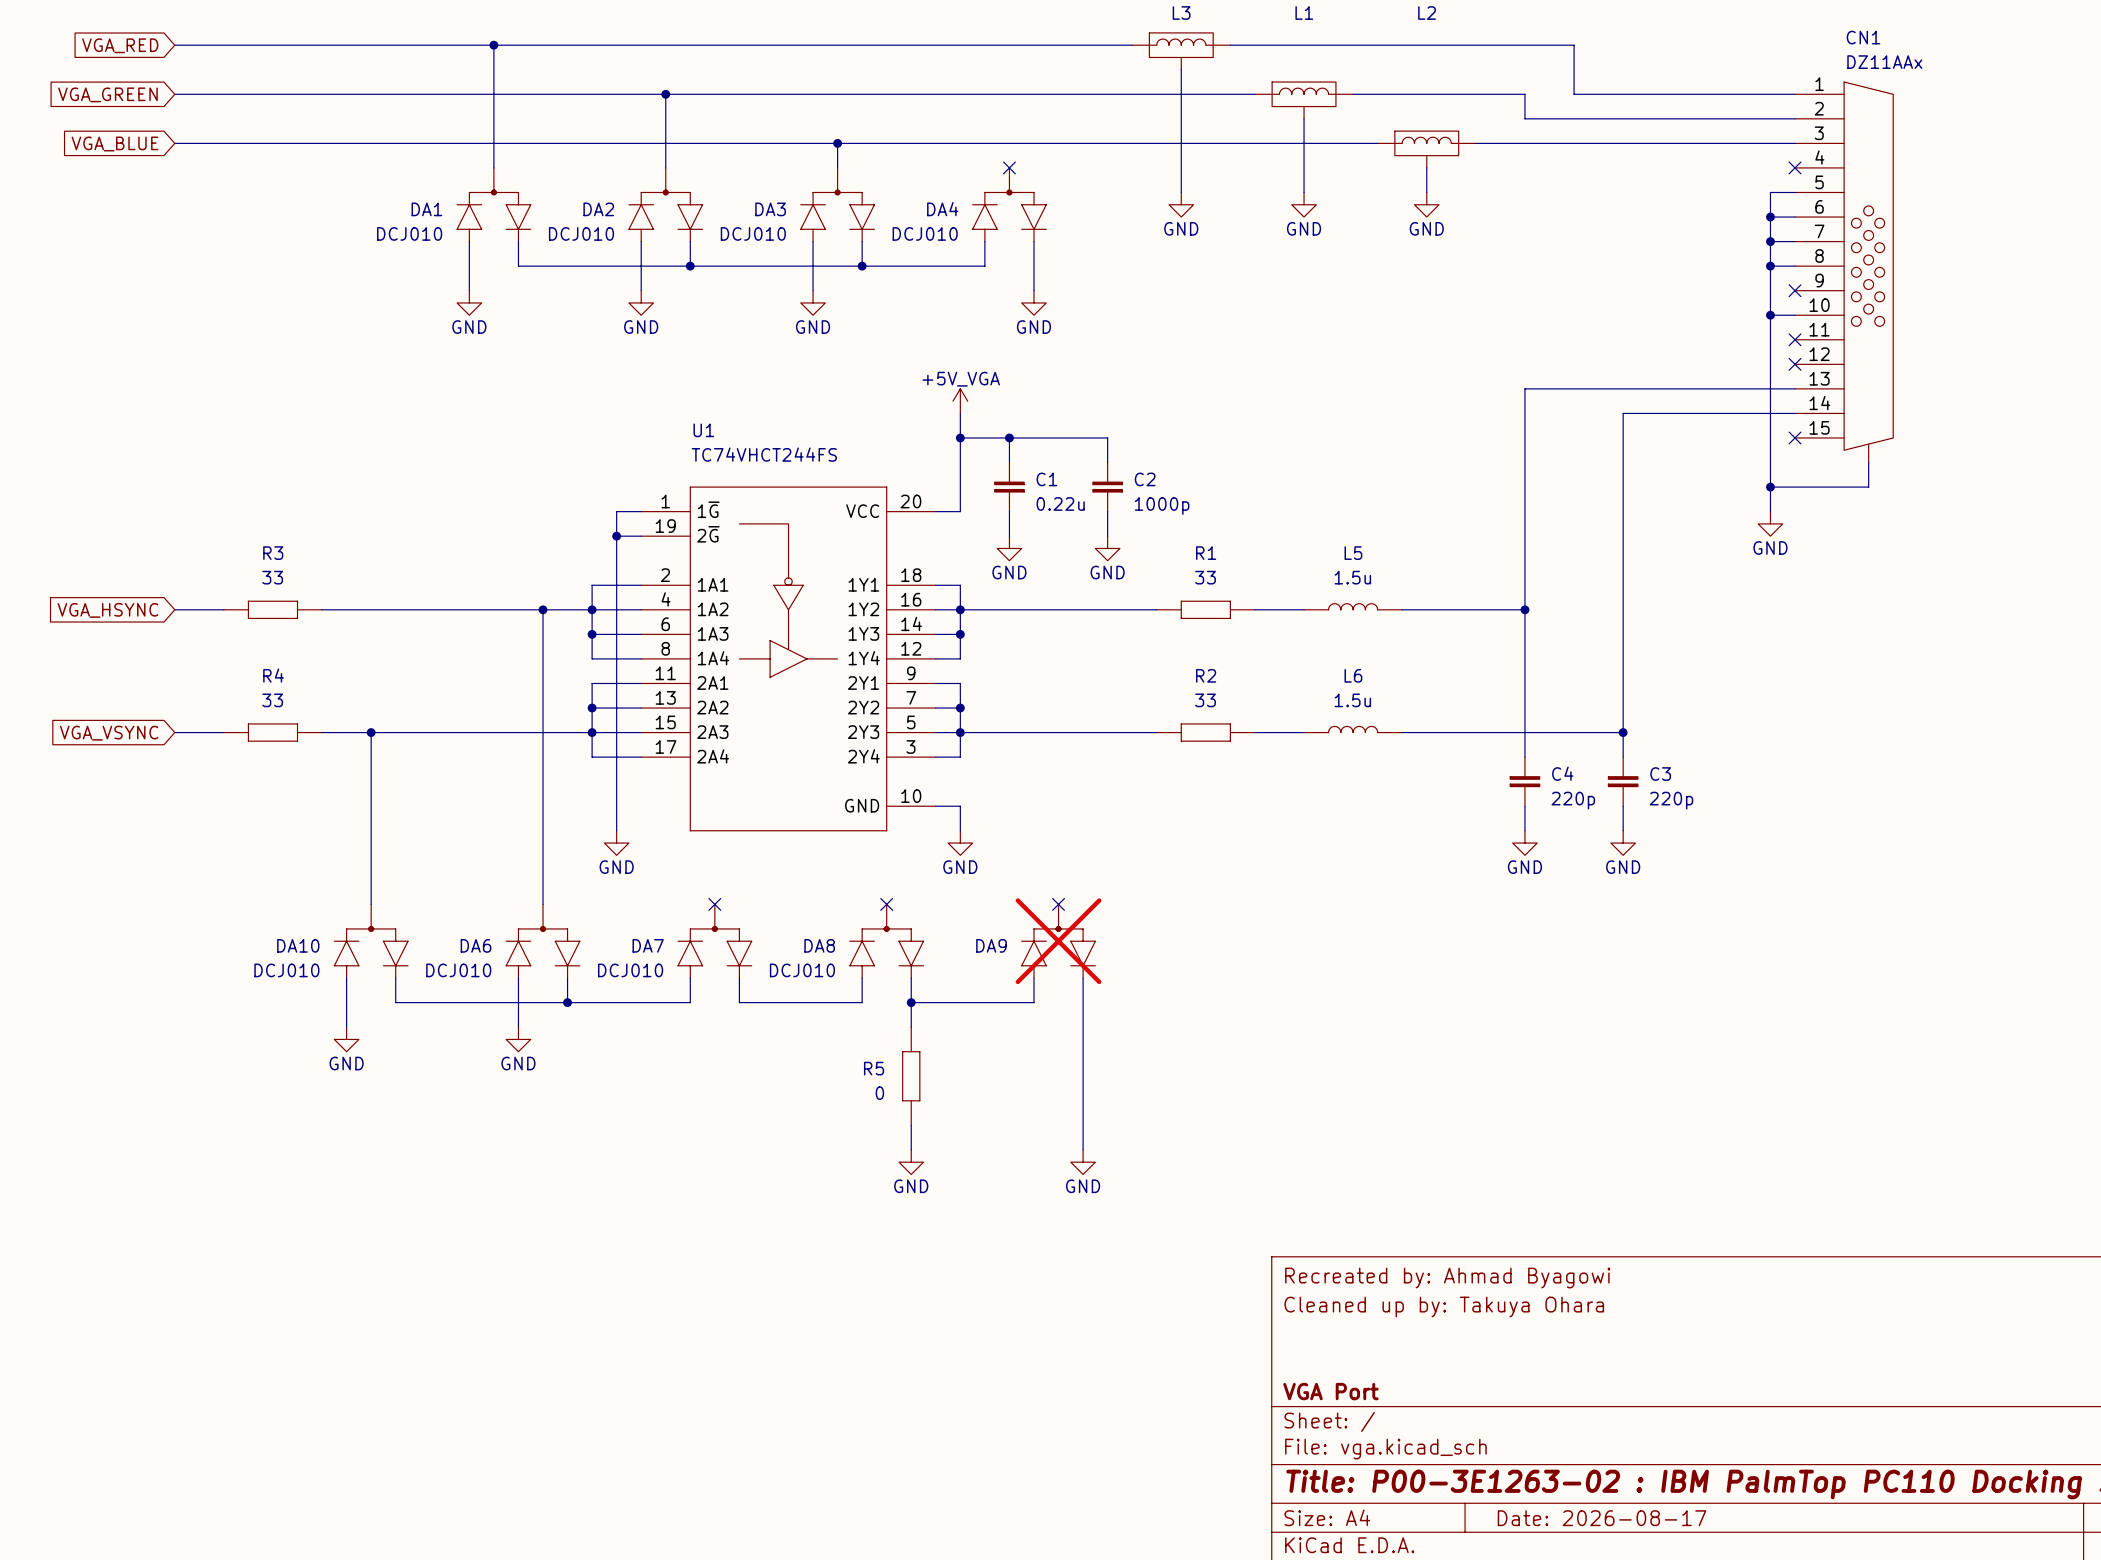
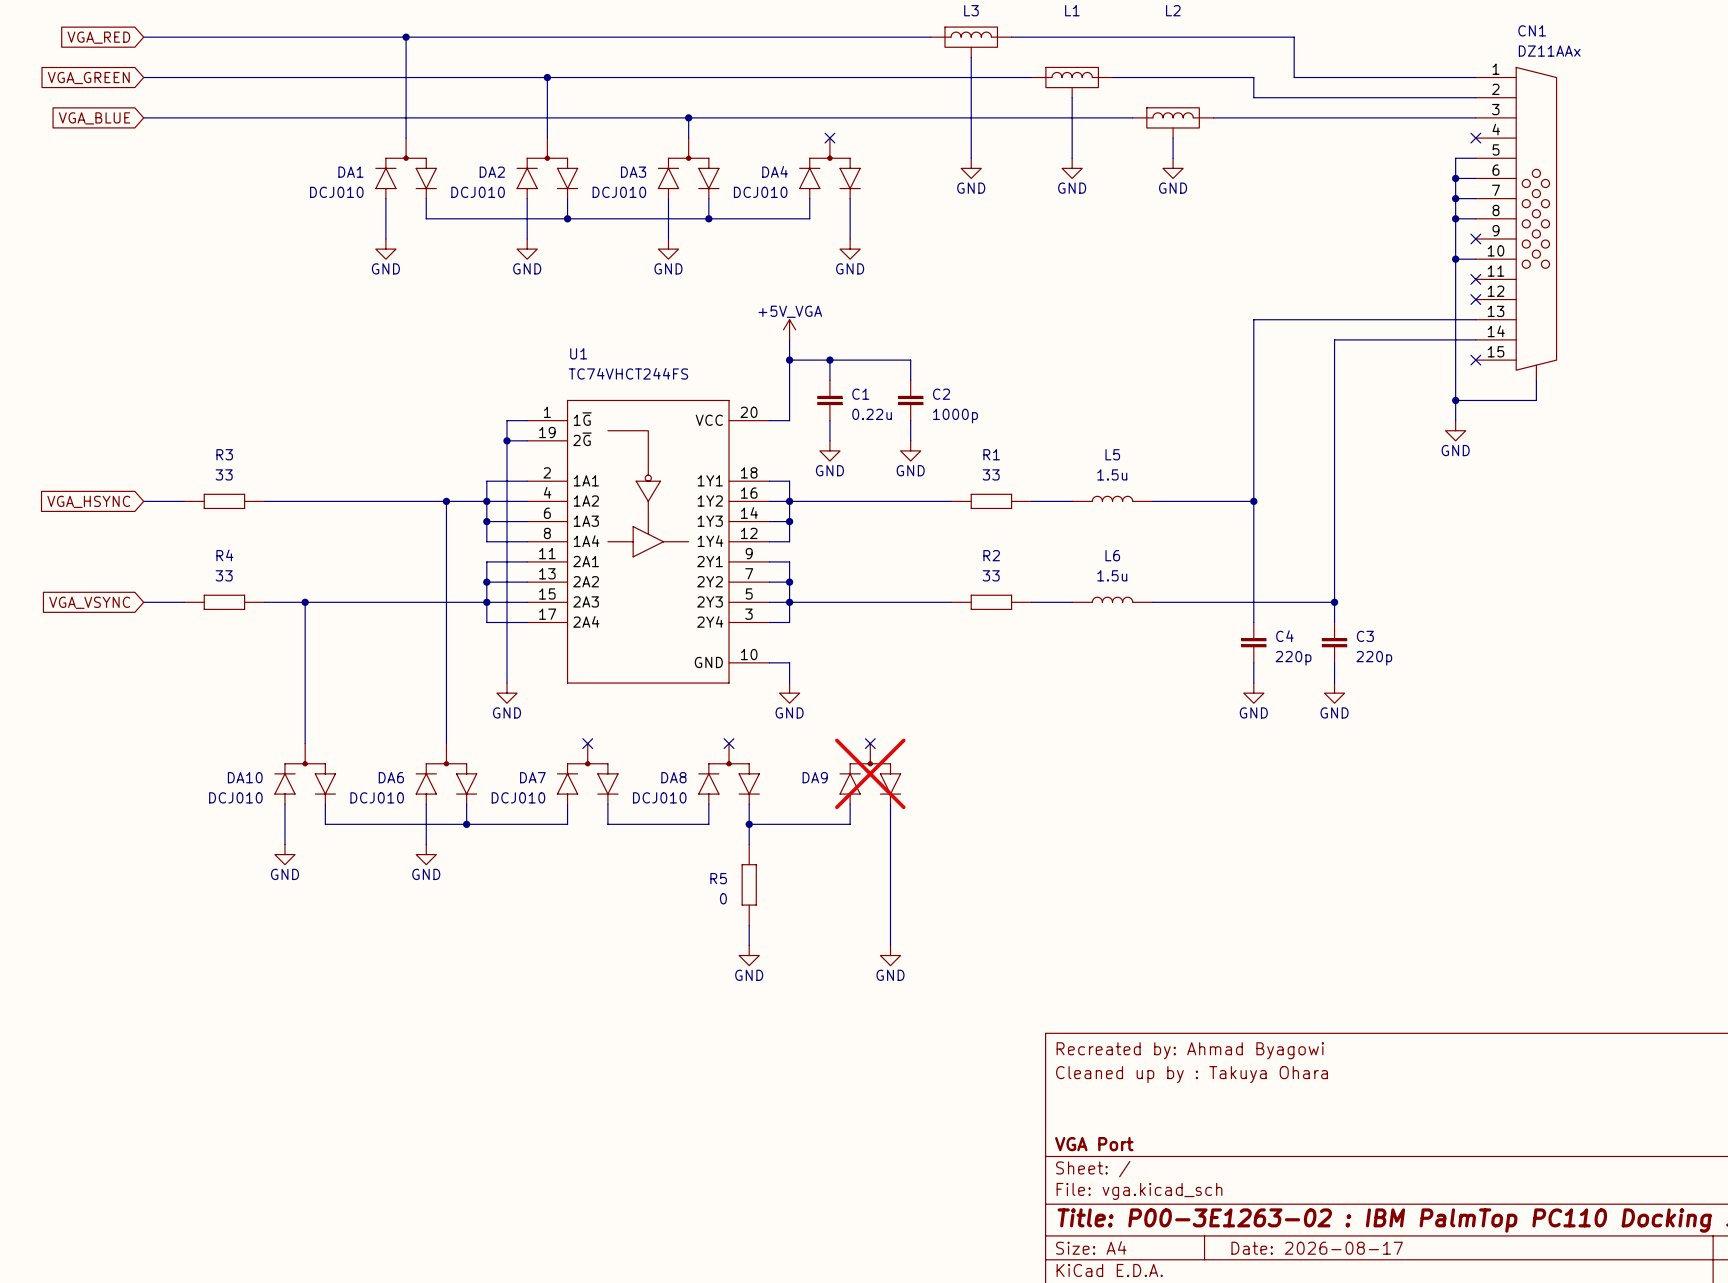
title block: Cleaned up by: Takuya Ohara (1444, 1307) -> Cleaned up by : Takuya Ohara (1192, 1074)

